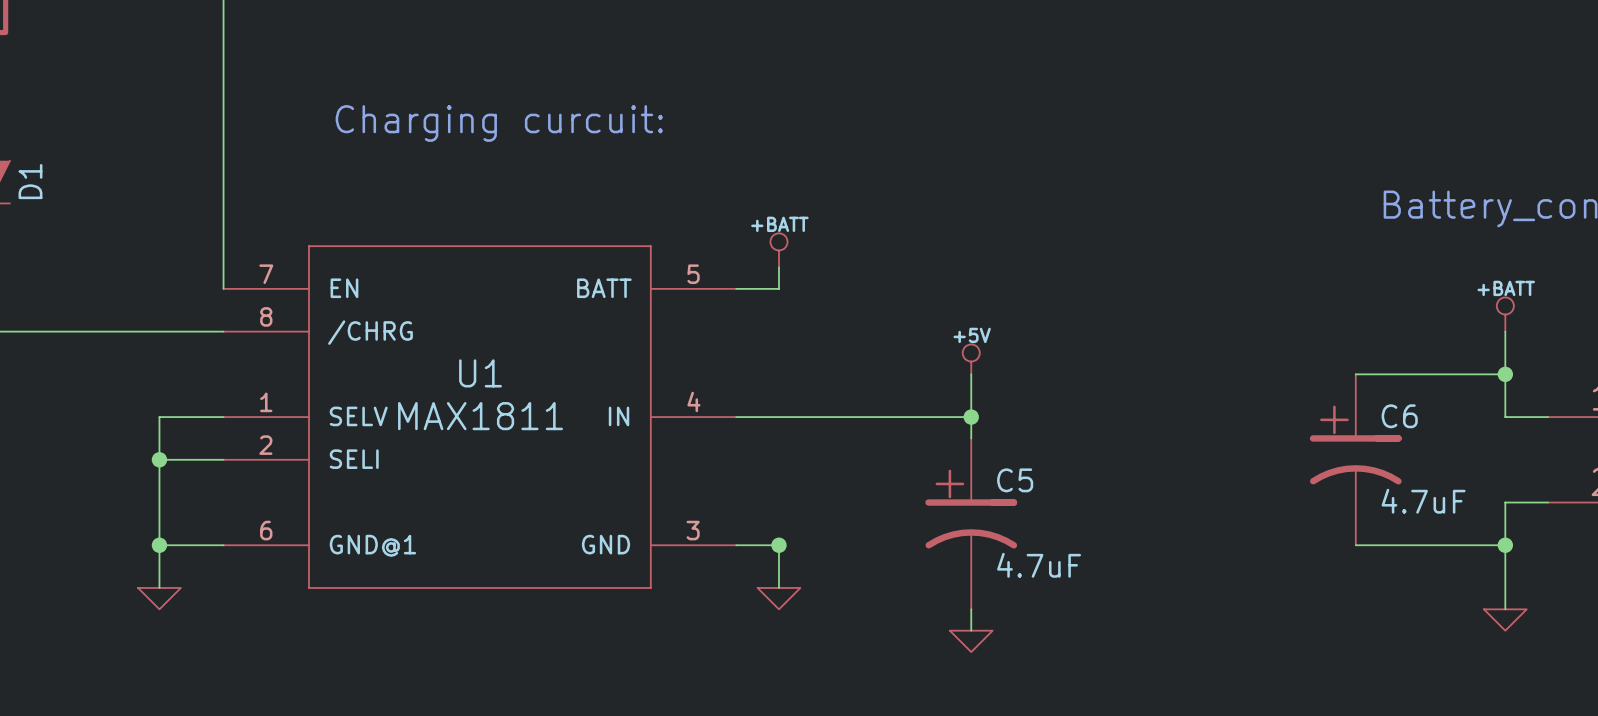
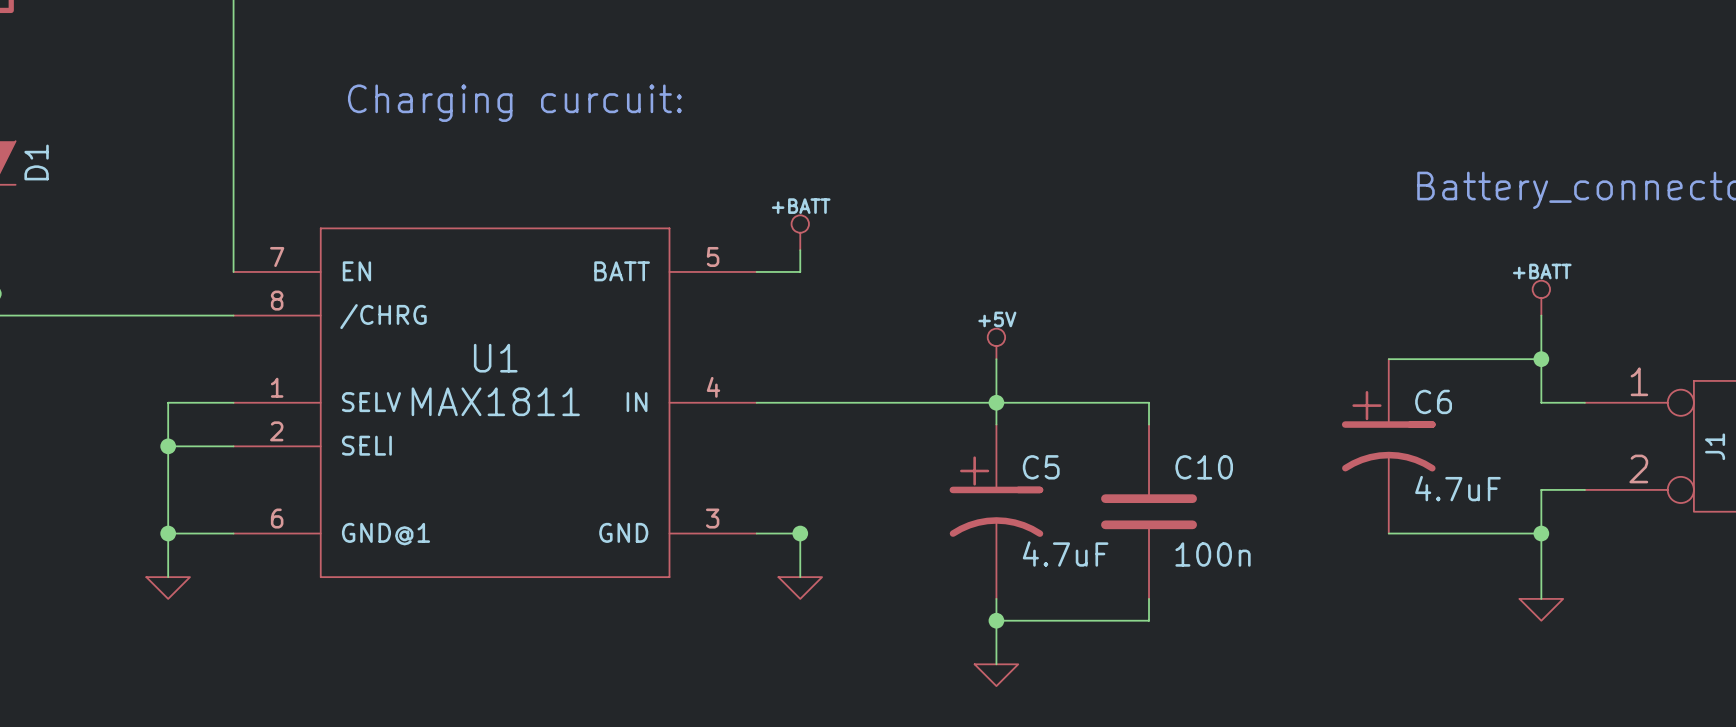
wire: none -> (996, 402) (1149, 402) (1149, 424)
C10: none -> 100n (1149, 511)
wire: none -> (1149, 598) (1149, 620) (996, 620) (996, 664)
junction: none -> (996, 620)
power symbol position: (971, 641) -> (996, 675)

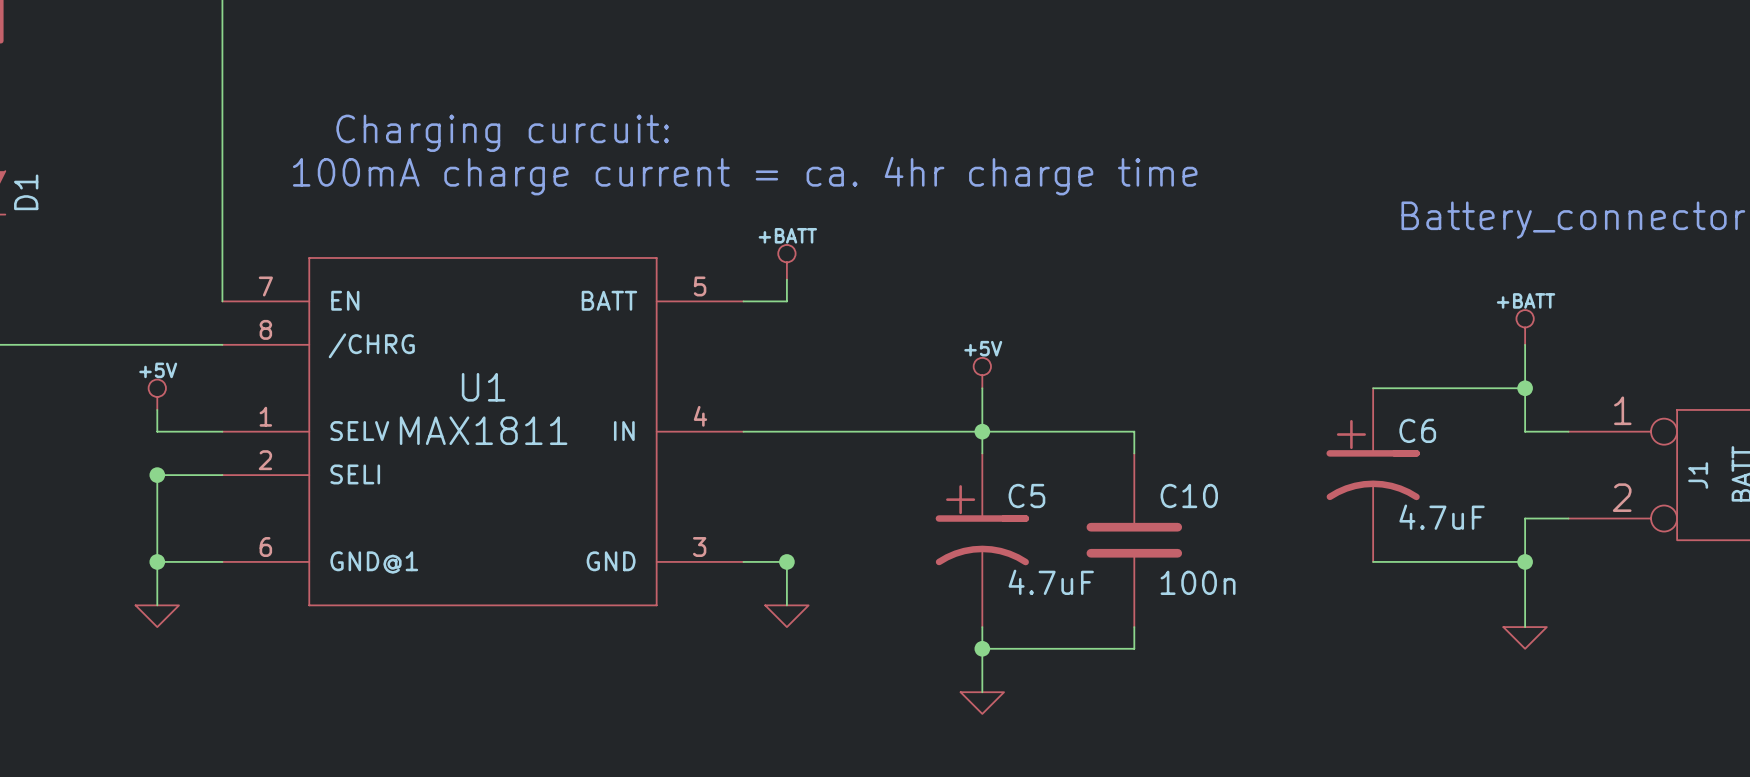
text: none -> 100mA charge current = ca. 4hr charge time (745, 176)
power symbol: none -> +5V (157, 394)
wire: (168, 402) (168, 446) -> (157, 431) (157, 409)

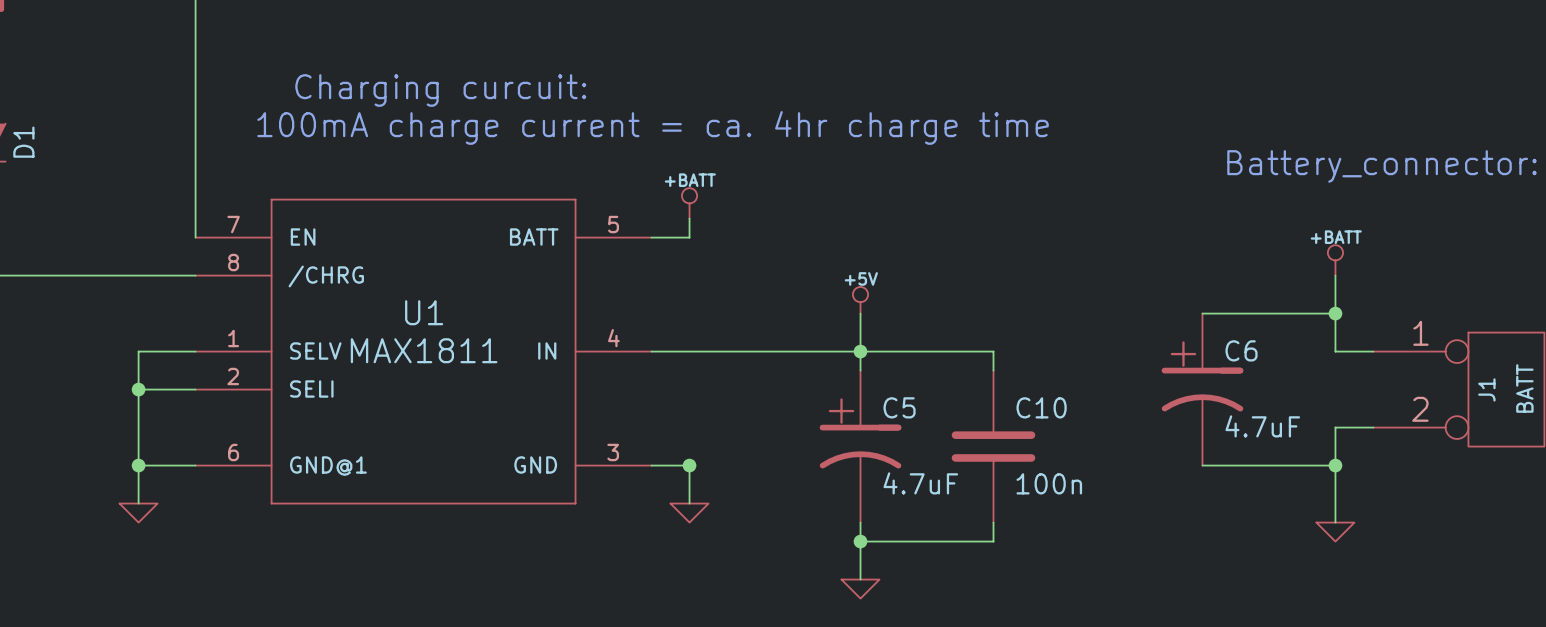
power symbol: +5V (157, 394) -> none
wire: (157, 409) (157, 431) -> (138, 389) (138, 351)

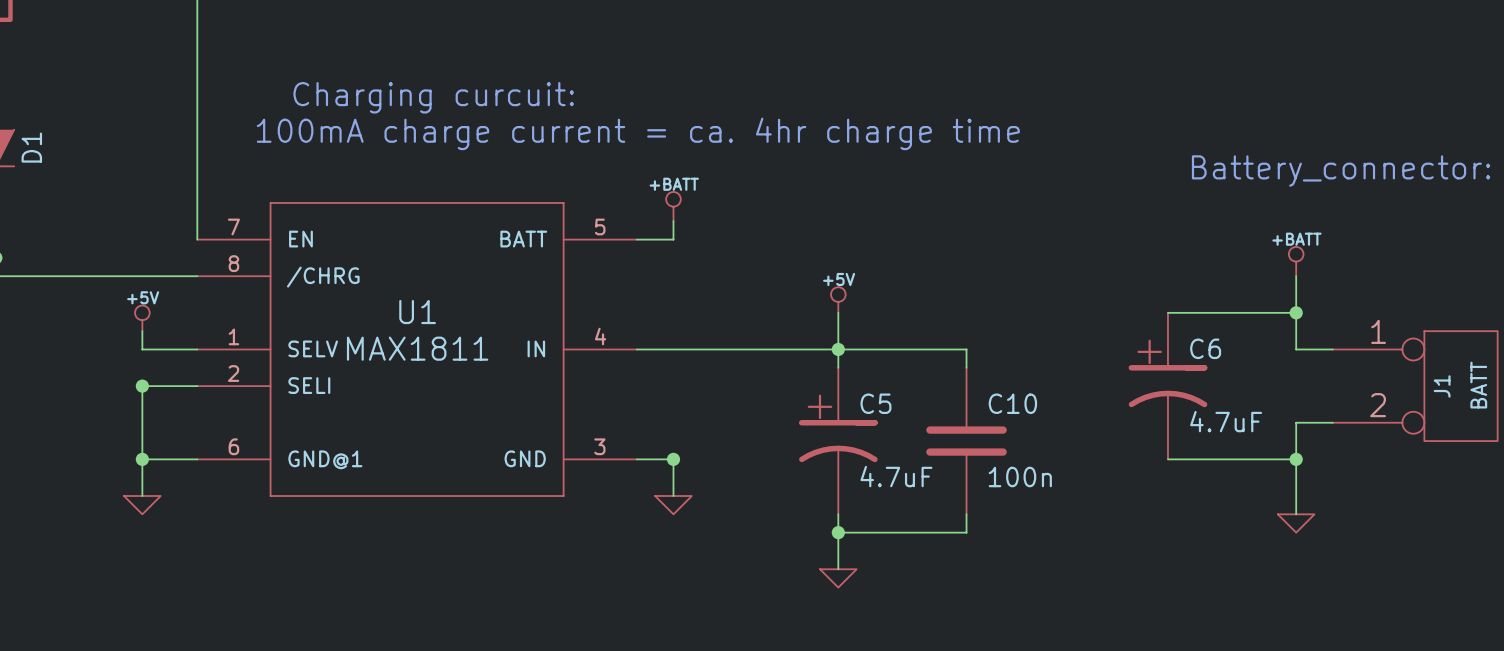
power symbol: none -> +5V (142, 318)
wire: (138, 351) (138, 389) -> (142, 349) (142, 331)

